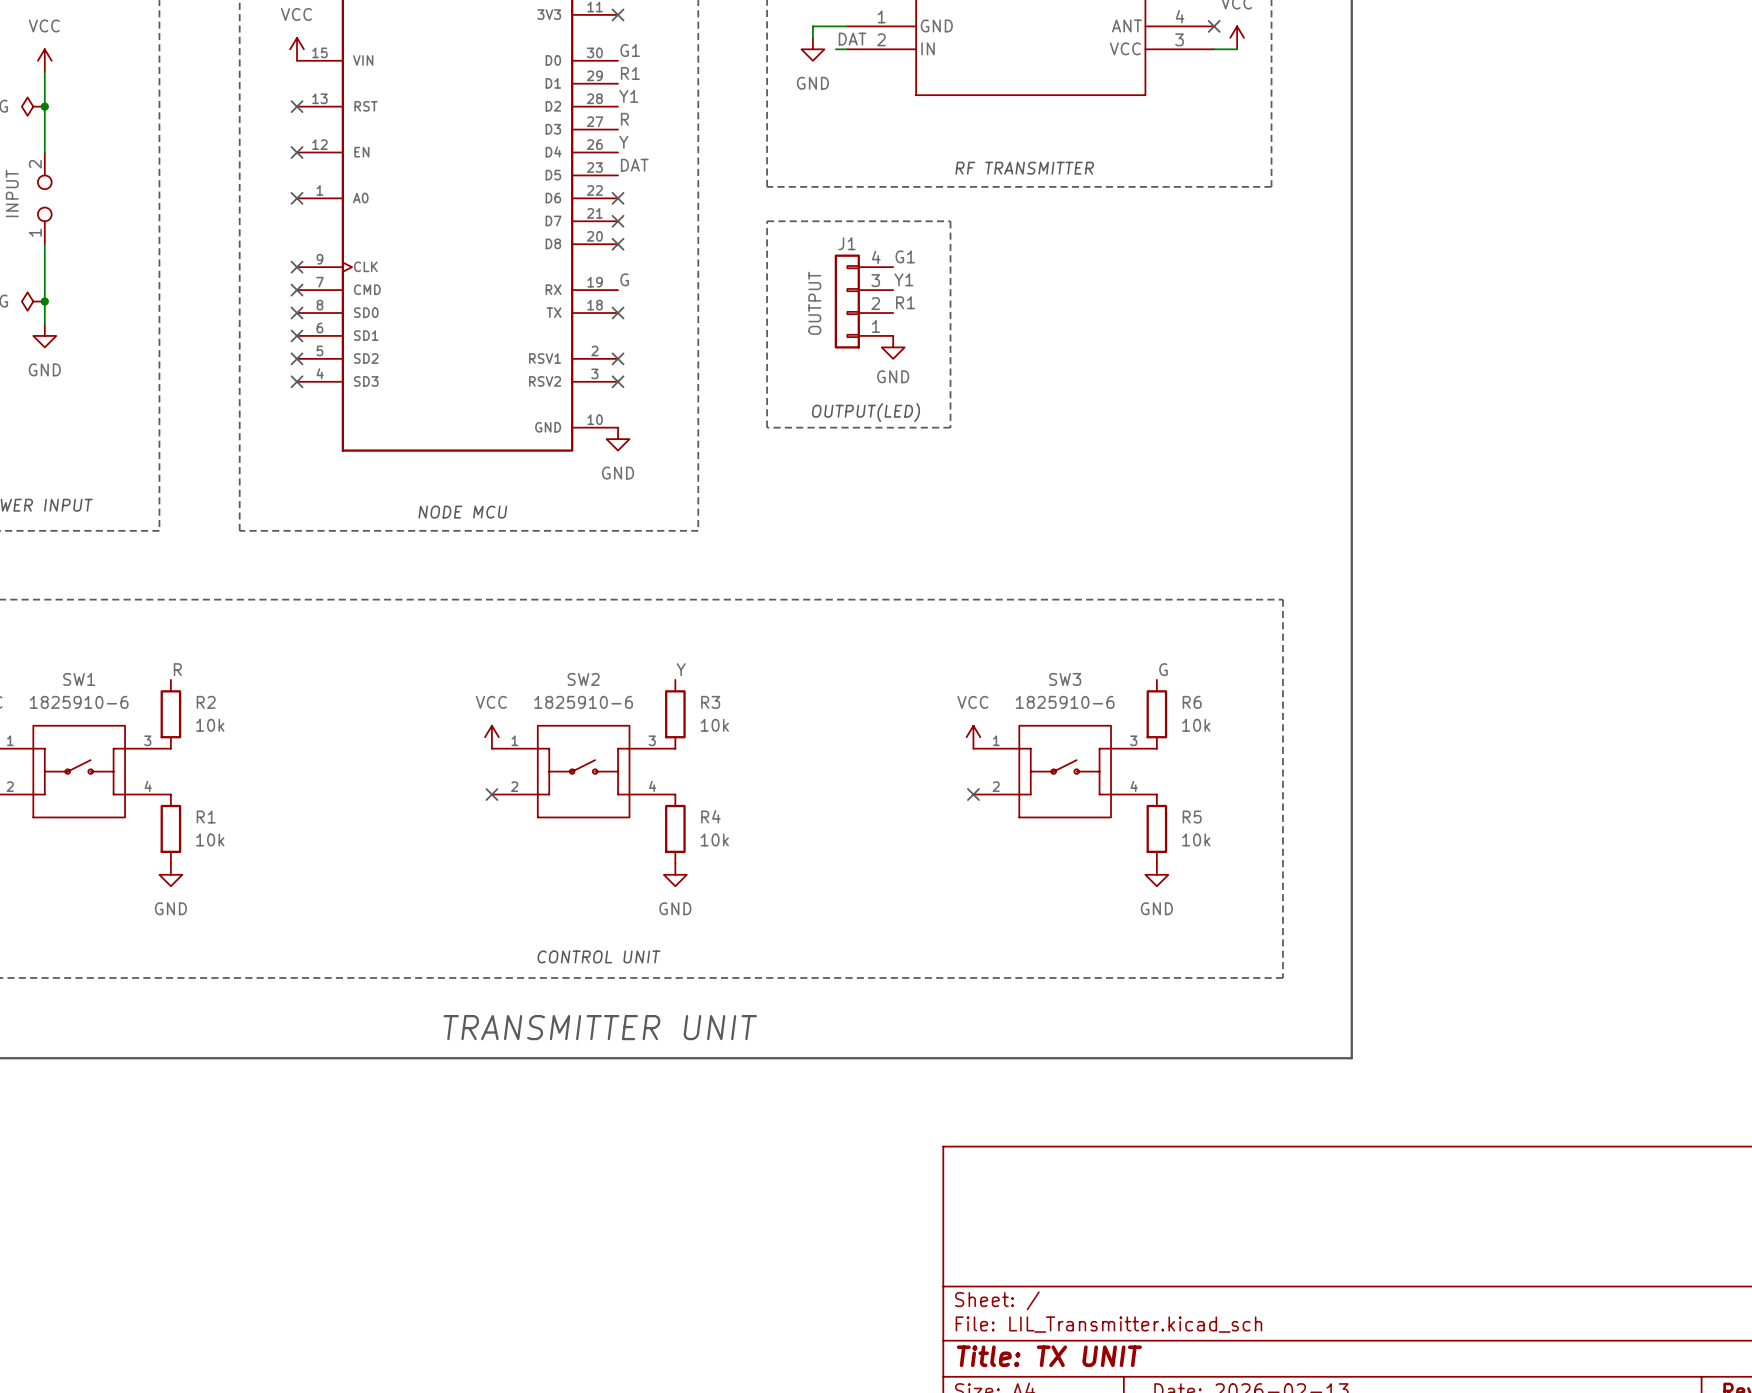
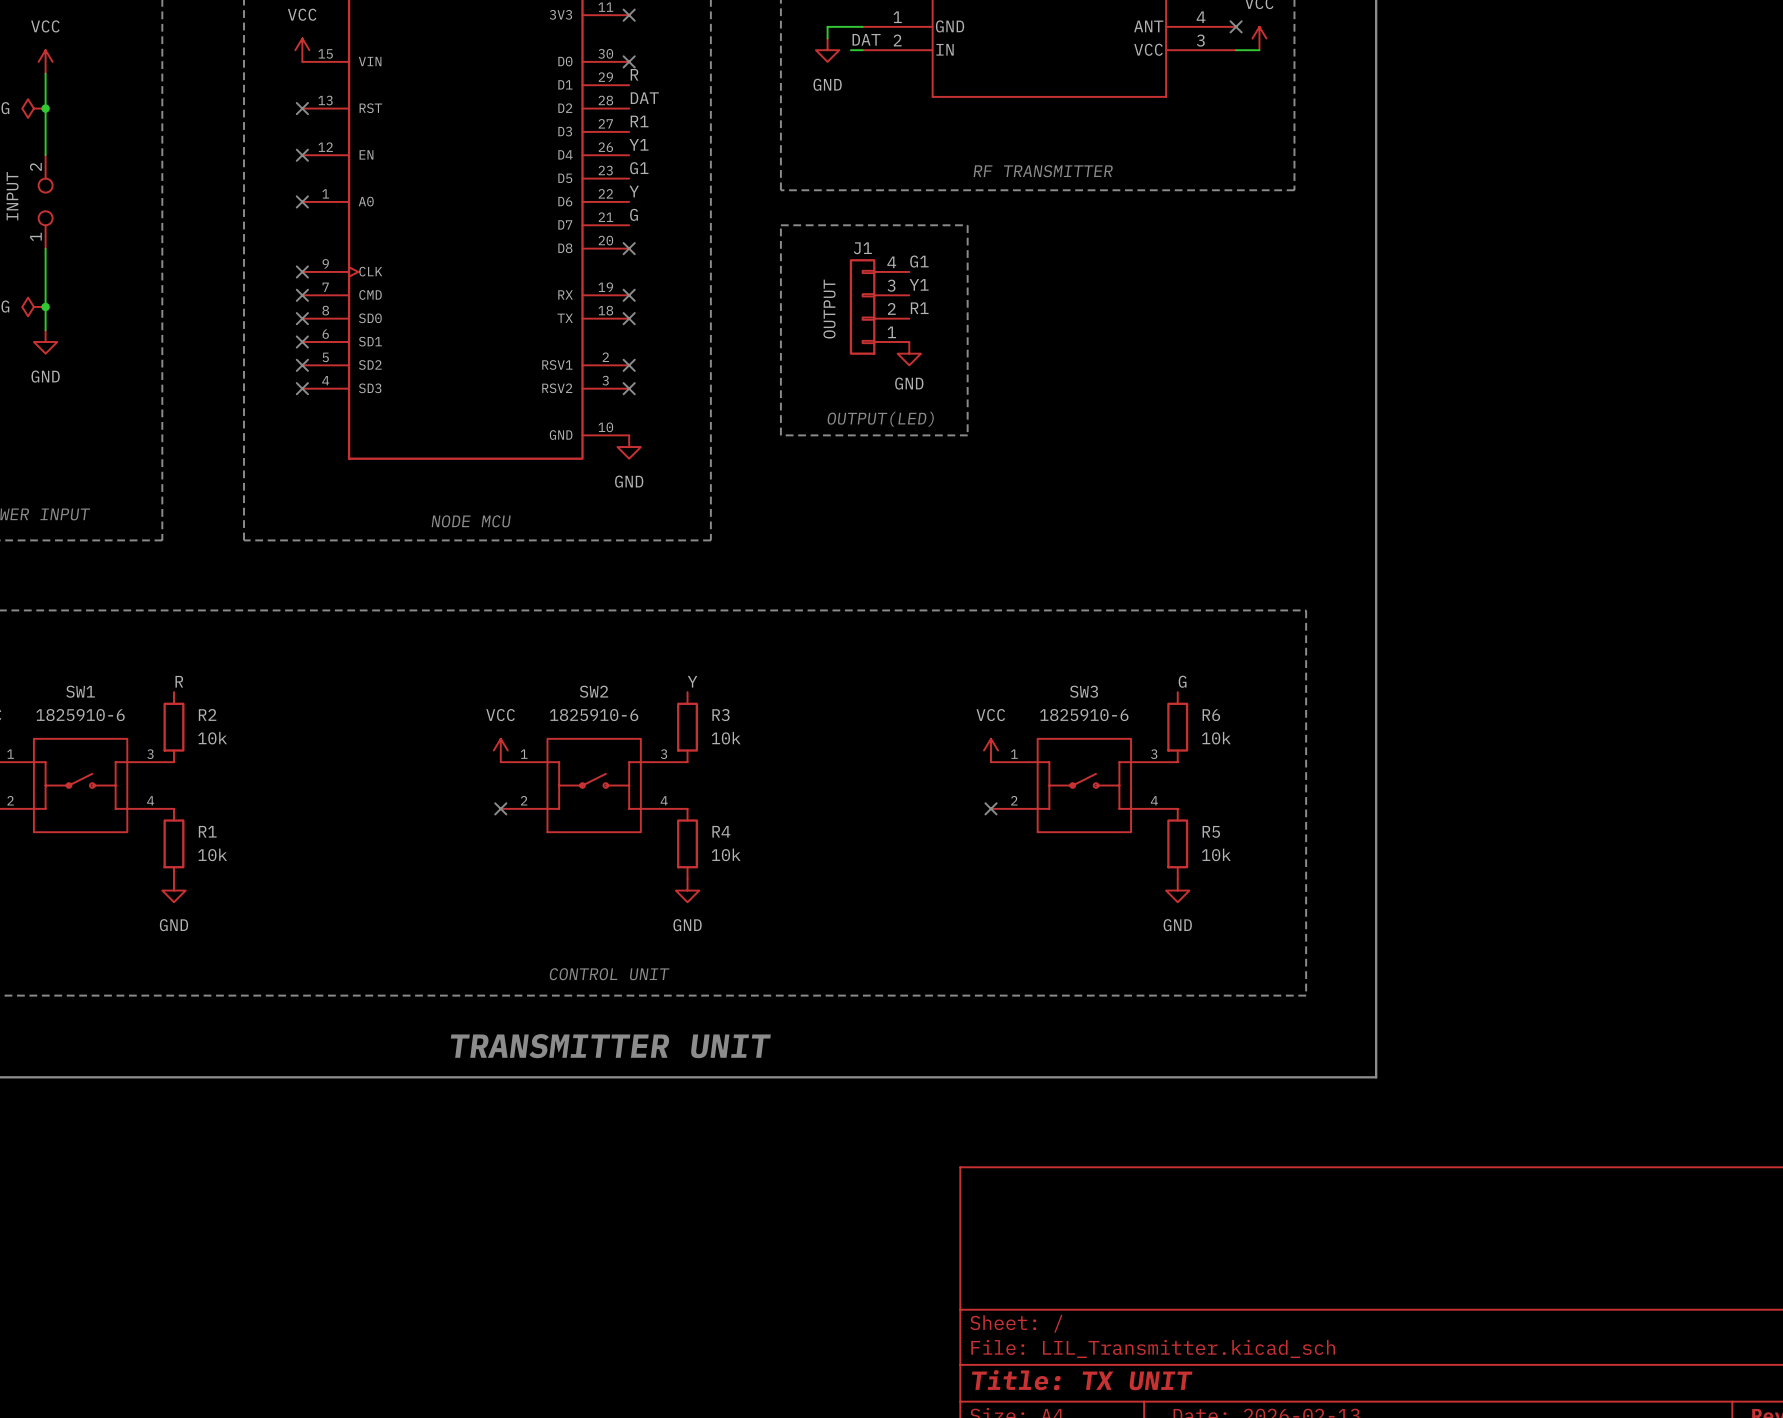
label: G1 (630, 50) -> none
no-connect mark: none -> (629, 61)
label: R1 (630, 73) -> R (634, 74)
label: Y1 (628, 96) -> DAT (644, 98)
label: R (624, 119) -> R1 (639, 121)
label: Y (623, 142) -> Y1 (638, 144)
label: DAT (634, 165) -> G1 (639, 168)
label: none -> Y (634, 191)
no-connect mark: (618, 198) -> none
no-connect mark: (618, 221) -> none
label position: G (624, 279) -> G (634, 214)
no-connect mark: none -> (629, 295)

